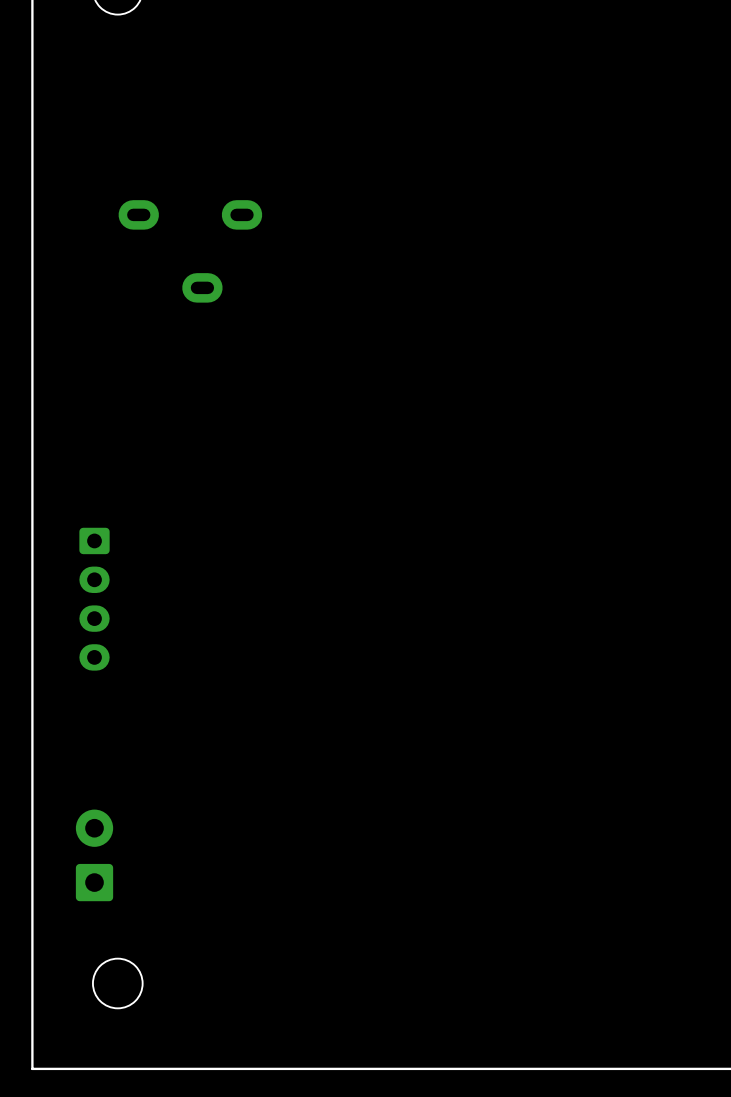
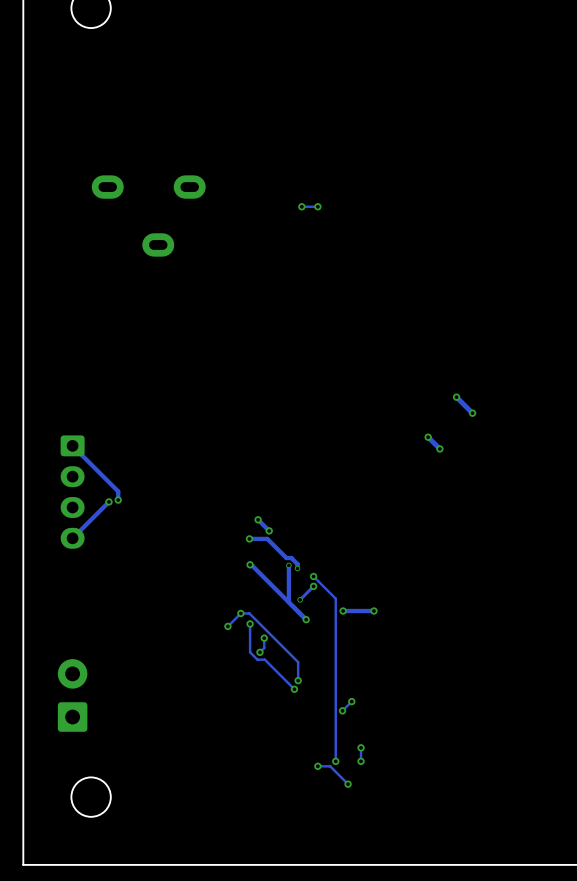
via: none -> (301, 206)
track: none -> (317, 206) (301, 206)
via: none -> (317, 206)
track: none -> (456, 397) (472, 413)
via: none -> (456, 397)
via: none -> (472, 413)
track: none -> (428, 437) (439, 448)
via: none -> (428, 437)
track: none -> (72, 445) (118, 491) (118, 500)
via: none -> (439, 448)
via: none -> (118, 500)
track: none -> (108, 501) (72, 538)
via: none -> (108, 501)
track: none -> (258, 519) (269, 530)
via: none -> (258, 519)
via: none -> (269, 530)
track: none -> (249, 538) (267, 538) (286, 558) (291, 558) (297, 564) (297, 568)
via: none -> (249, 538)
track: none -> (250, 564) (306, 619)
via: none -> (250, 564)
track: none -> (288, 565) (288, 602)
via: none -> (288, 565)
via: none -> (297, 568)
track: none -> (313, 576) (335, 598) (335, 761)
via: none -> (313, 576)
track: none -> (313, 586) (300, 599)
via: none -> (313, 586)
via: none -> (300, 599)
via: none -> (343, 611)
track: none -> (373, 611) (343, 611)
via: none -> (373, 611)
via: none -> (240, 613)
via: none -> (306, 619)
track: none -> (250, 623) (250, 652) (257, 659) (264, 659) (294, 689)
via: none -> (250, 623)
track: none -> (227, 626) (240, 613) (249, 613) (298, 662) (298, 680)
via: none -> (227, 626)
track: none -> (264, 638) (264, 647) (259, 652)
via: none -> (264, 638)
via: none -> (259, 652)
via: none -> (298, 680)
via: none -> (294, 689)
track: none -> (351, 701) (342, 710)
via: none -> (351, 701)
via: none -> (342, 710)
track: none -> (361, 747) (361, 761)
via: none -> (361, 747)
via: none -> (335, 761)
via: none -> (361, 761)
track: none -> (317, 766) (330, 766) (348, 784)
via: none -> (317, 766)
via: none -> (348, 784)

